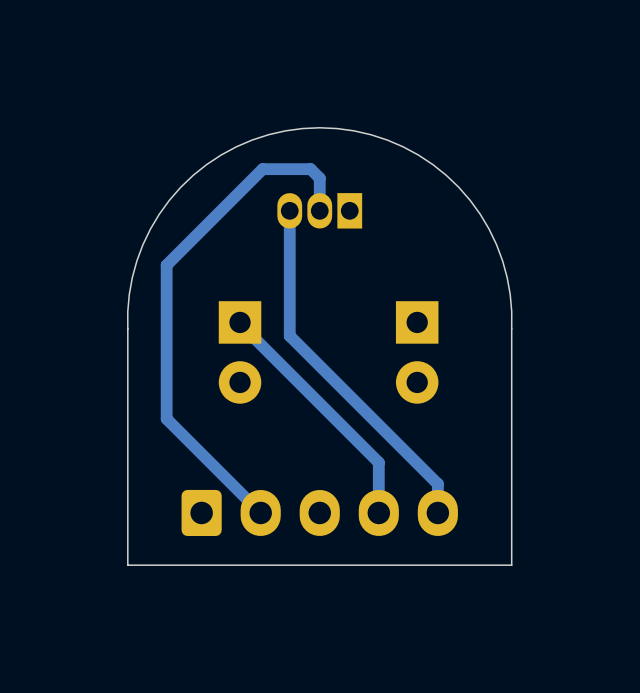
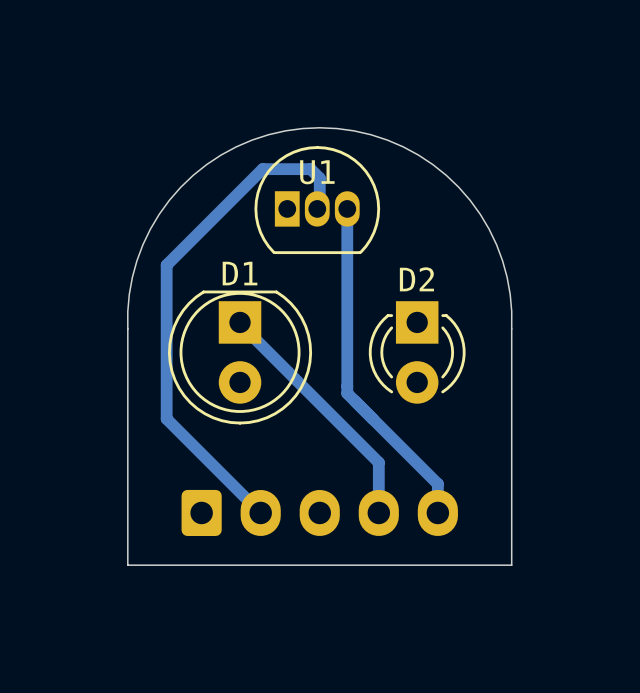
track: (289, 205) (289, 335) (347, 393) -> none
track: none -> (347, 208) (347, 393) (354, 401)
U1 side: top (319, 210) -> bottom (317, 200)
D1 side: top (240, 352) -> bottom (240, 357)
D2 side: top (417, 352) -> bottom (417, 352)

